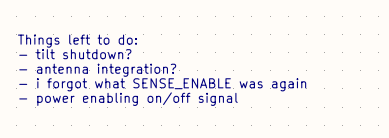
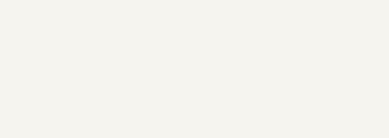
text: Things left to do: (77, 41) -> none
text: - tilt shutdown? (75, 54) -> none
text: - antenna integration? (97, 70) -> none
text: - i forgot what SENSE_ENABLE was again (162, 84) -> none
text: - power enabling on/off signal (128, 99) -> none

